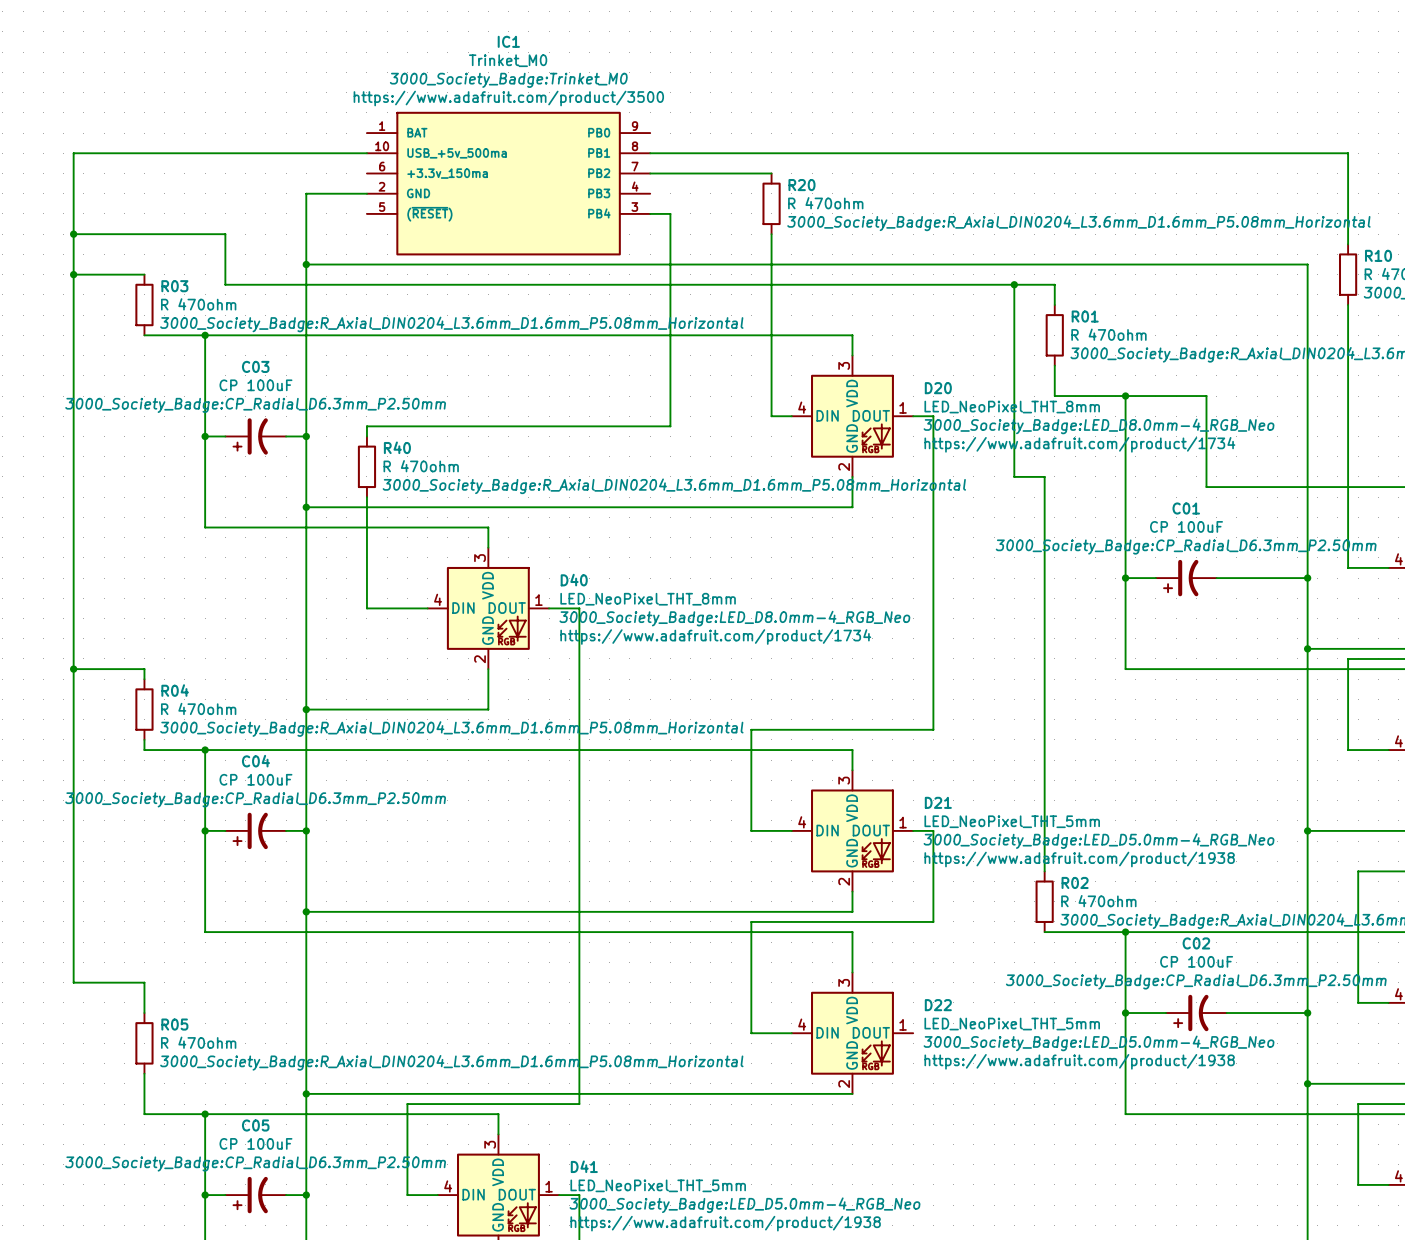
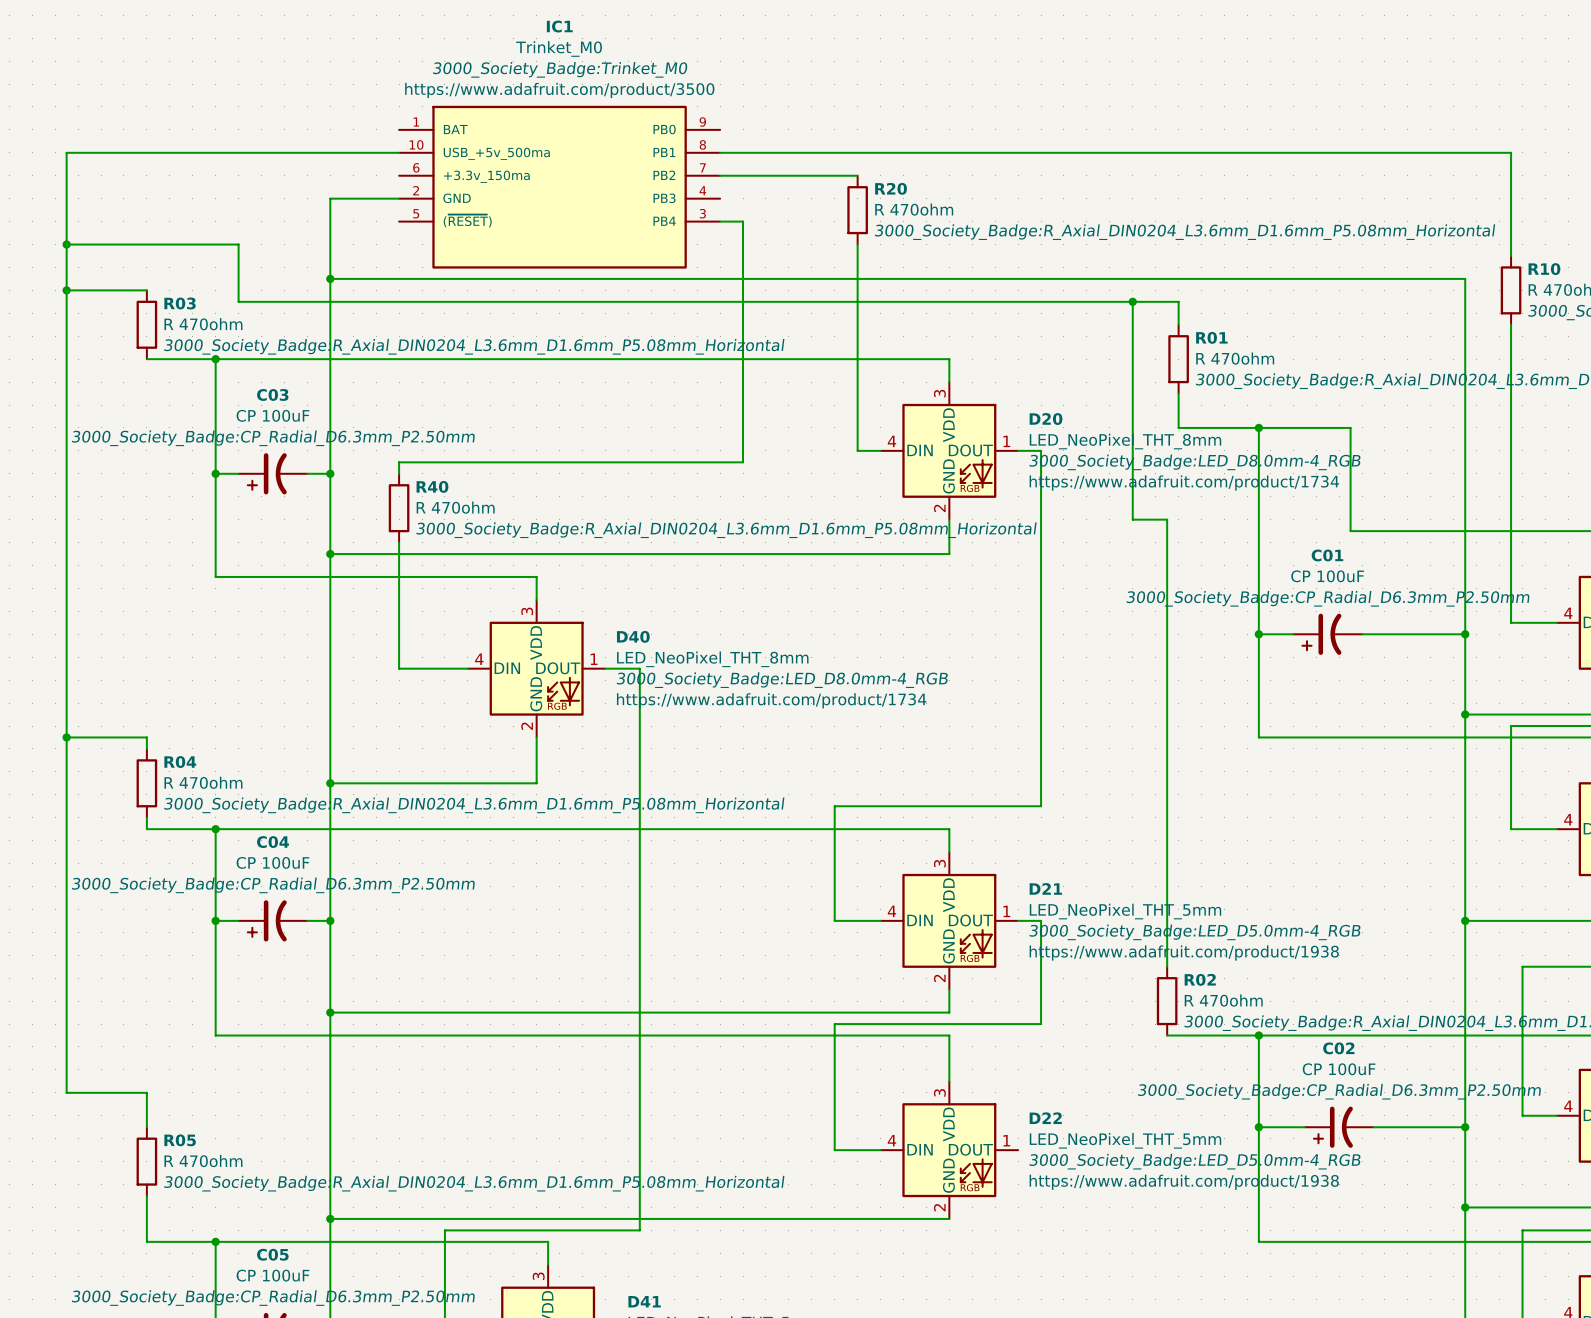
D20 text: 3000_Society_Badge:LED_D8.0mm-4_RGB_Neo (1099, 426) -> 3000_Society_Badge:LED_D8.0mm-4_RGB (1195, 462)
D40 text: 3000_Society_Badge:LED_D8.0mm-4_RGB_Neo (734, 618) -> 3000_Society_Badge:LED_D8.0mm-4_RGB (782, 680)
D21 text: 3000_Society_Badge:LED_D5.0mm-4_RGB_Neo (1099, 841) -> 3000_Society_Badge:LED_D5.0mm-4_RGB (1195, 932)
D22 text: 3000_Society_Badge:LED_D5.0mm-4_RGB_Neo (1099, 1043) -> 3000_Society_Badge:LED_D5.0mm-4_RGB (1195, 1161)

